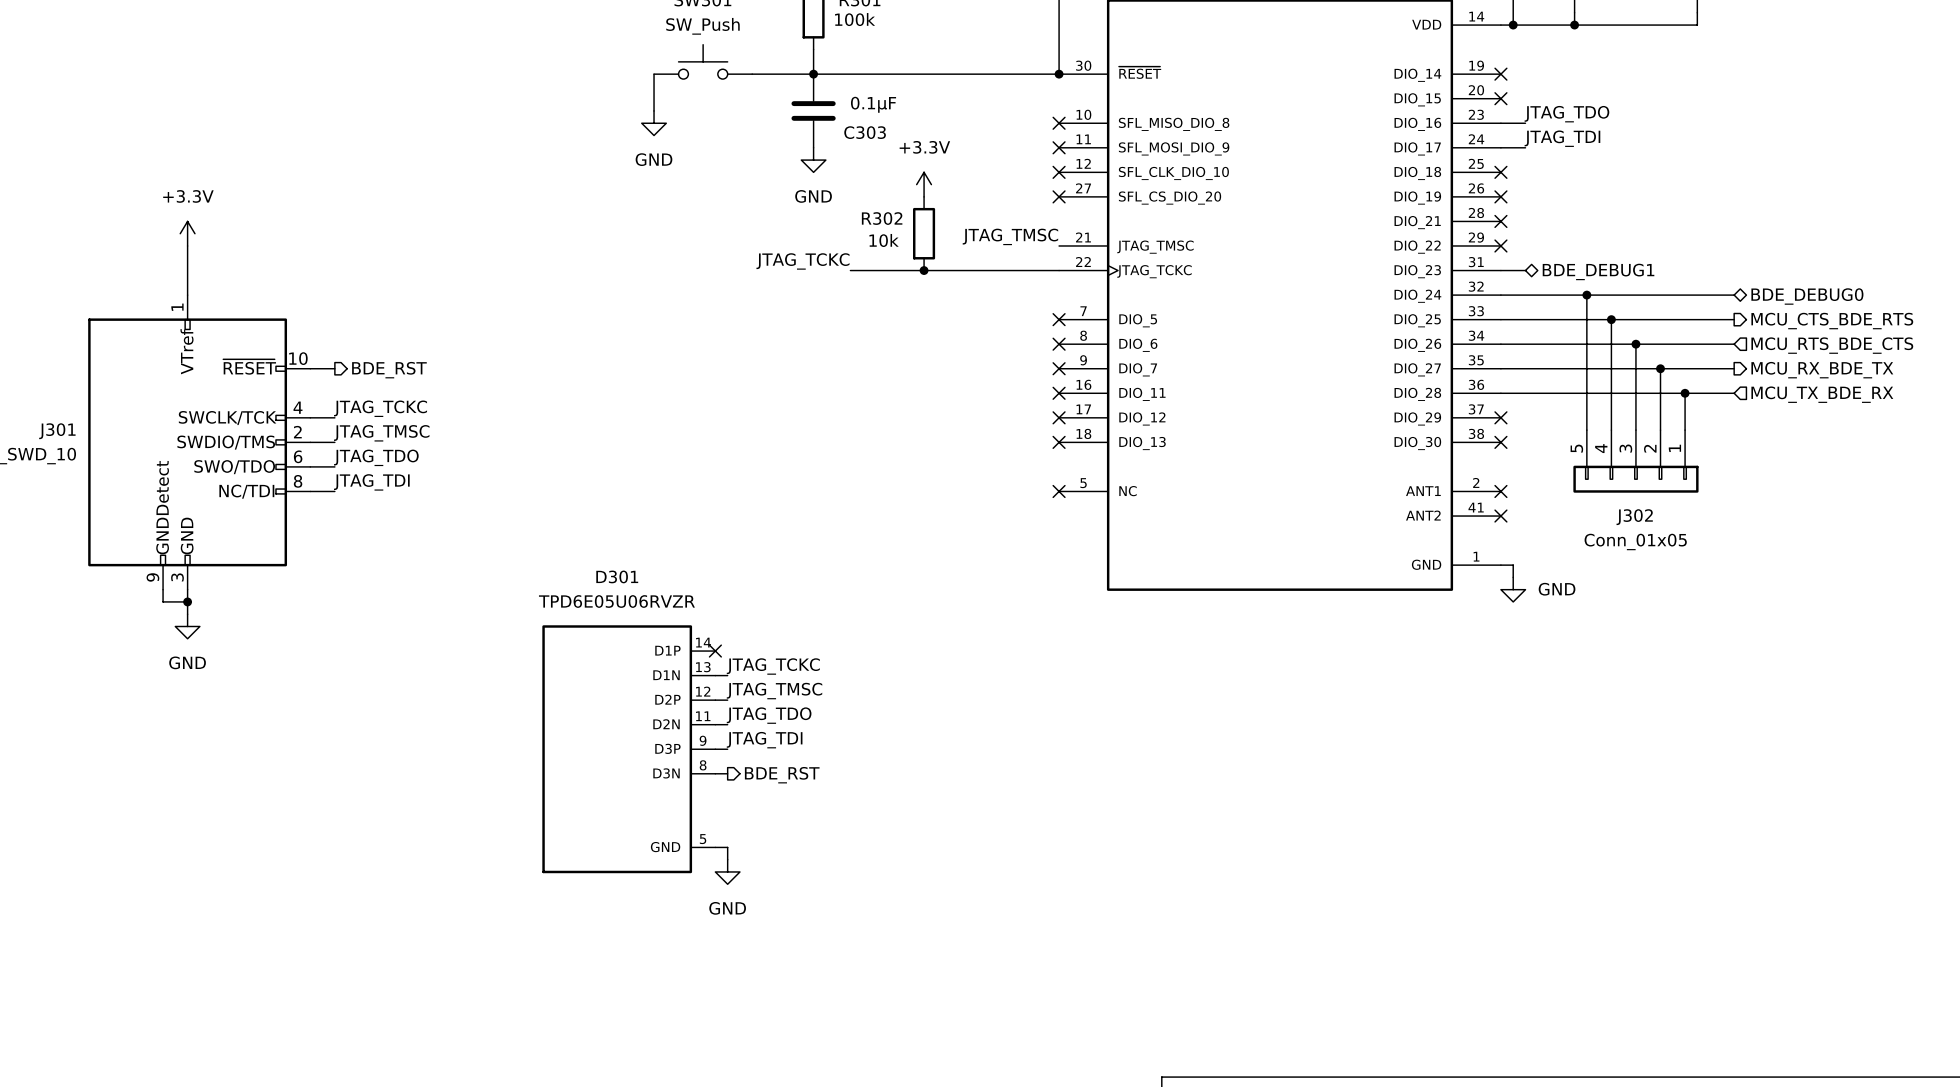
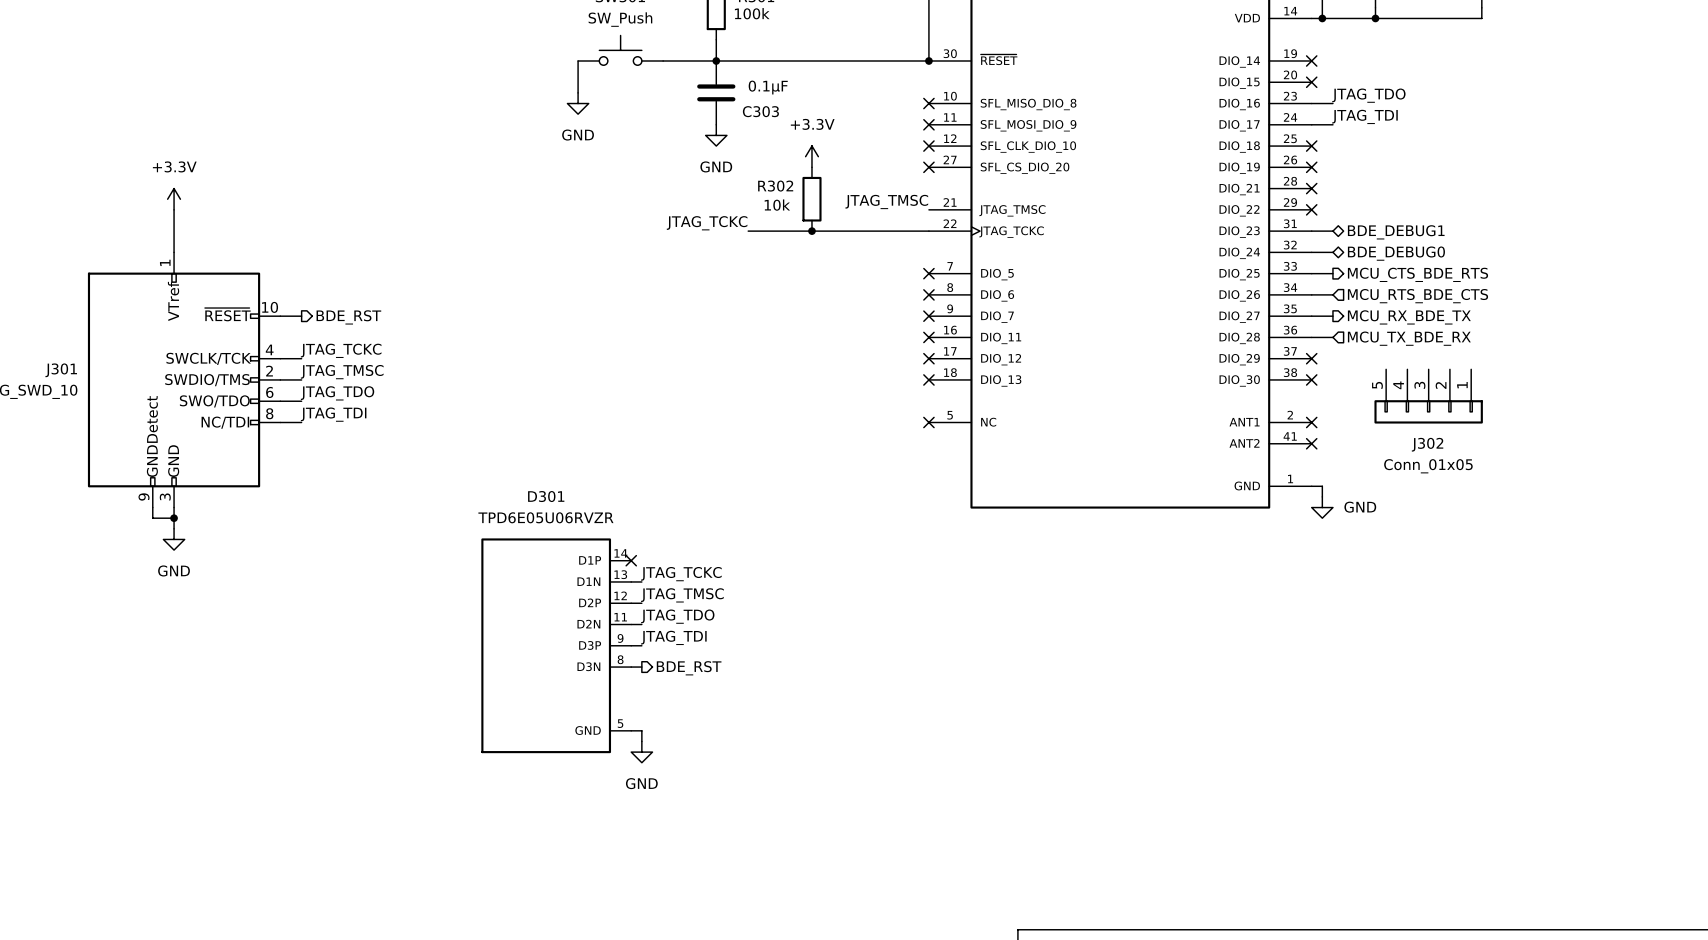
wire: (1525, 295) (1734, 295) -> none
wire: (1586, 295) (1586, 430) -> none
junction: (1586, 295) -> none
hierarchical label position: BDE_DEBUG0 (1807, 296) -> BDE_DEBUG0 (1396, 253)
wire: (1525, 319) (1734, 319) -> none
wire: (1611, 319) (1611, 430) -> none
junction: (1611, 319) -> none
hierarchical label position: MCU_CTS_BDE_RTS (1832, 321) -> MCU_CTS_BDE_RTS (1417, 274)
wire: (1525, 344) (1734, 344) -> none
wire: (1635, 344) (1635, 430) -> none
junction: (1635, 344) -> none
hierarchical label position: MCU_RTS_BDE_CTS (1832, 345) -> MCU_RTS_BDE_CTS (1417, 296)
wire: (1525, 368) (1734, 368) -> none
wire: (1660, 368) (1660, 430) -> none
junction: (1660, 368) -> none
hierarchical label position: MCU_RX_BDE_TX (1822, 370) -> MCU_RX_BDE_TX (1409, 317)
wire: (1525, 393) (1734, 393) -> none
wire: (1685, 393) (1685, 430) -> none
junction: (1685, 393) -> none
hierarchical label position: MCU_TX_BDE_RX (1822, 394) -> MCU_TX_BDE_RX (1409, 338)

